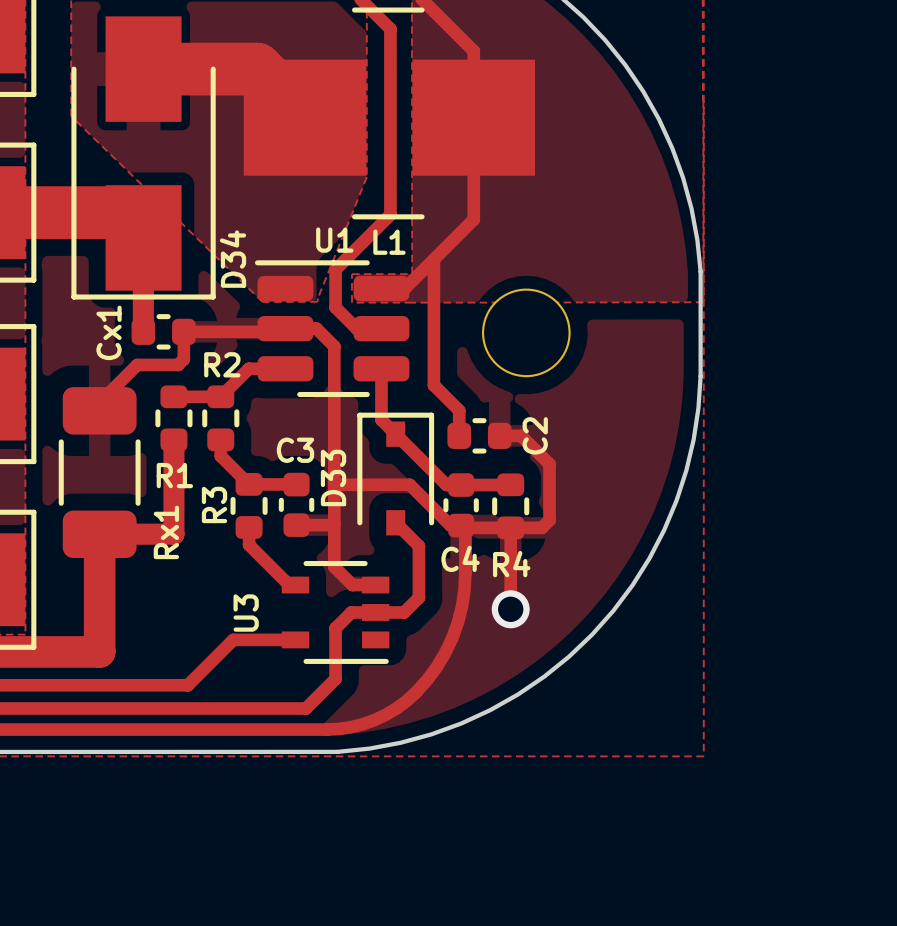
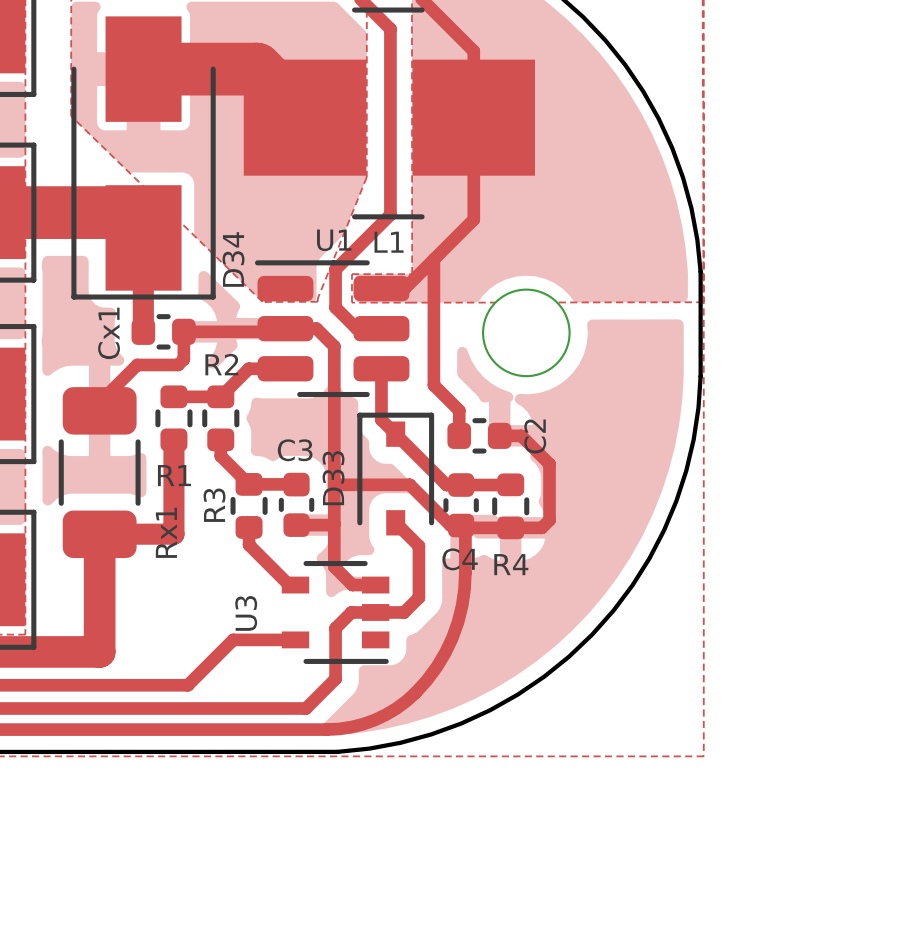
track: (510, 527) (510, 609) -> none
via: (510, 609) -> none

